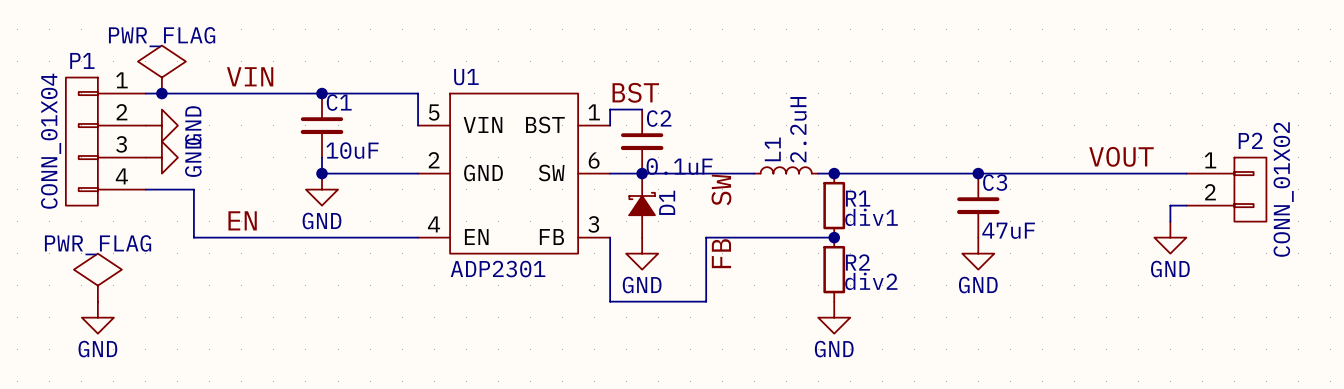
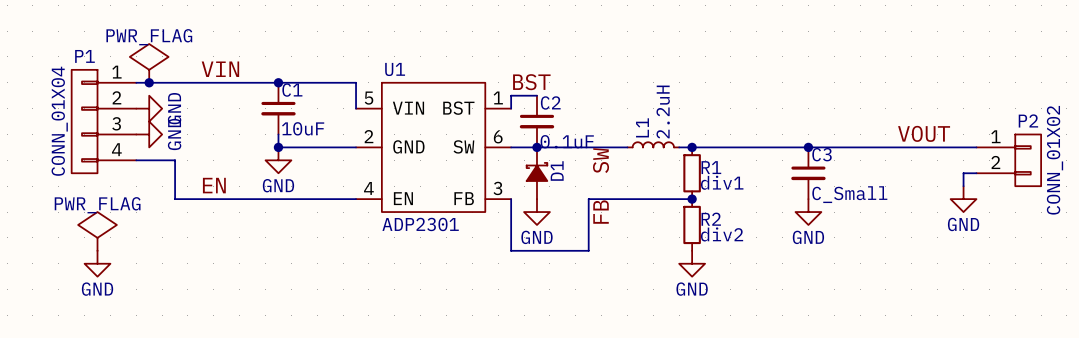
C3 value: 47uF (1008, 230) -> C_Small (849, 194)

